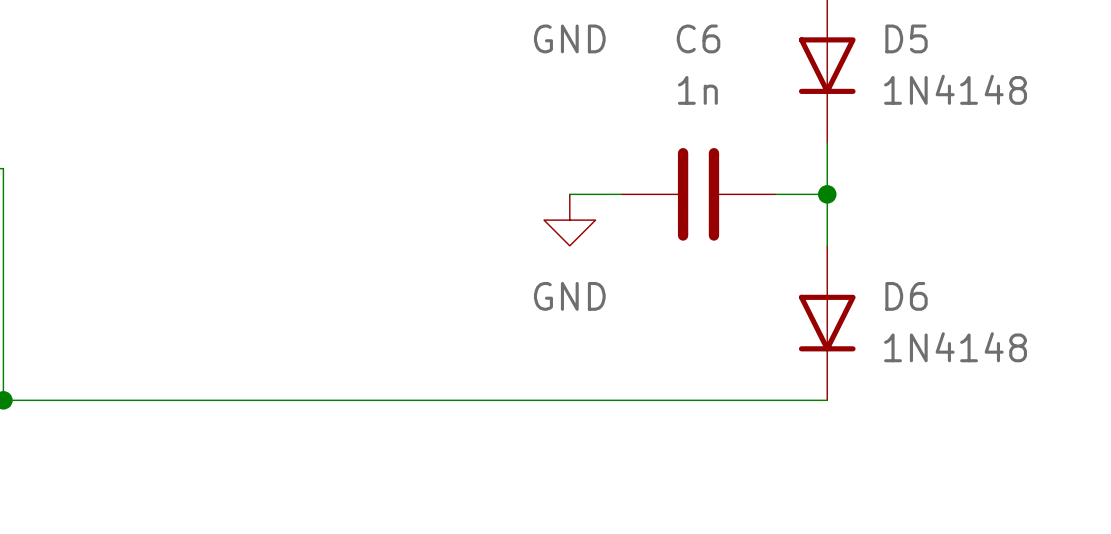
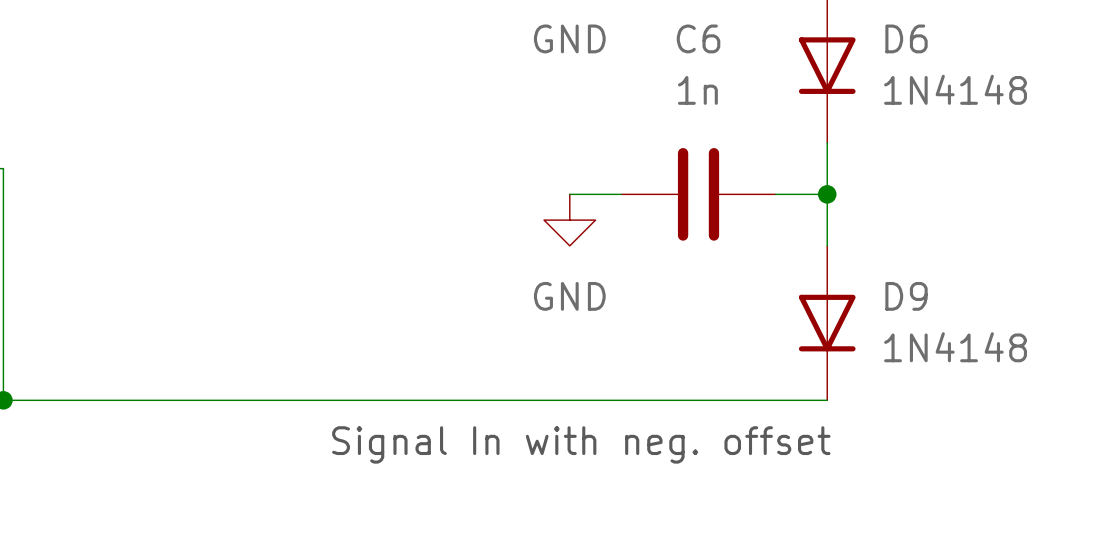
D5 name: D5 (906, 38) -> D6 (906, 38)
D6 name: D6 (906, 296) -> D9 (906, 296)
text: none -> Signal In with neg. offset (581, 444)

